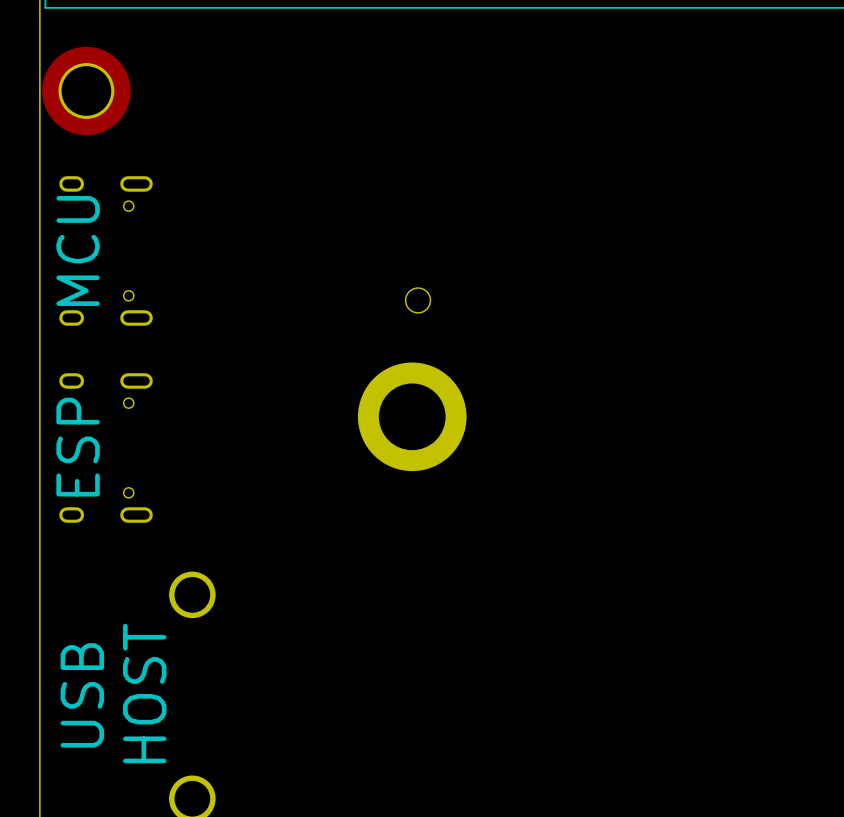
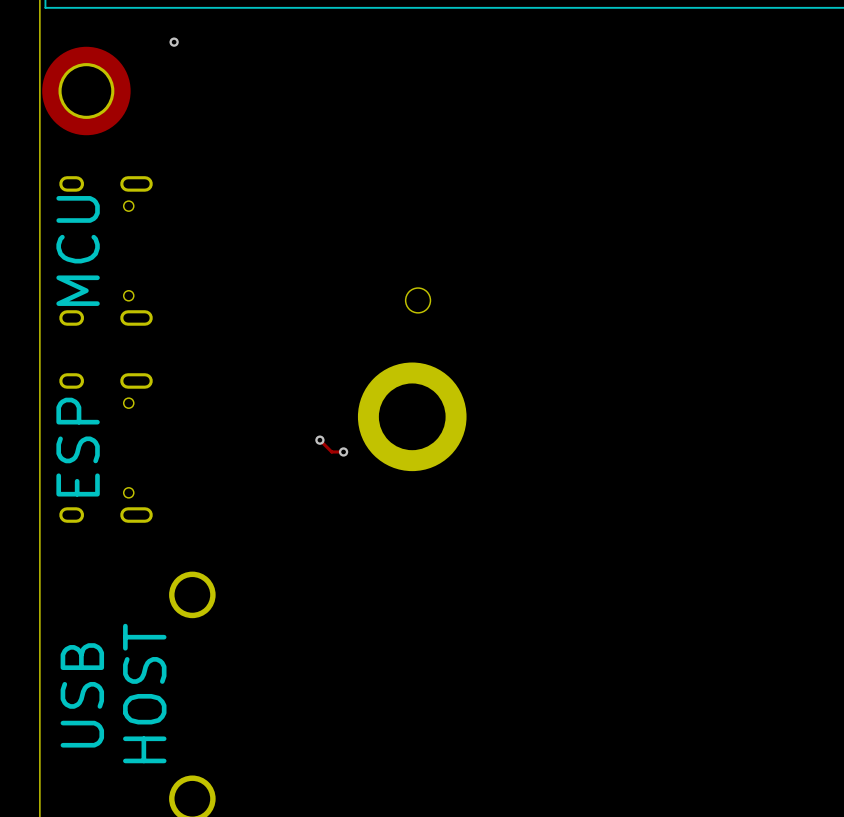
via: none -> (174, 42)
track: none -> (319, 440) (331, 451) (343, 451)
via: none -> (319, 440)
via: none -> (343, 451)

